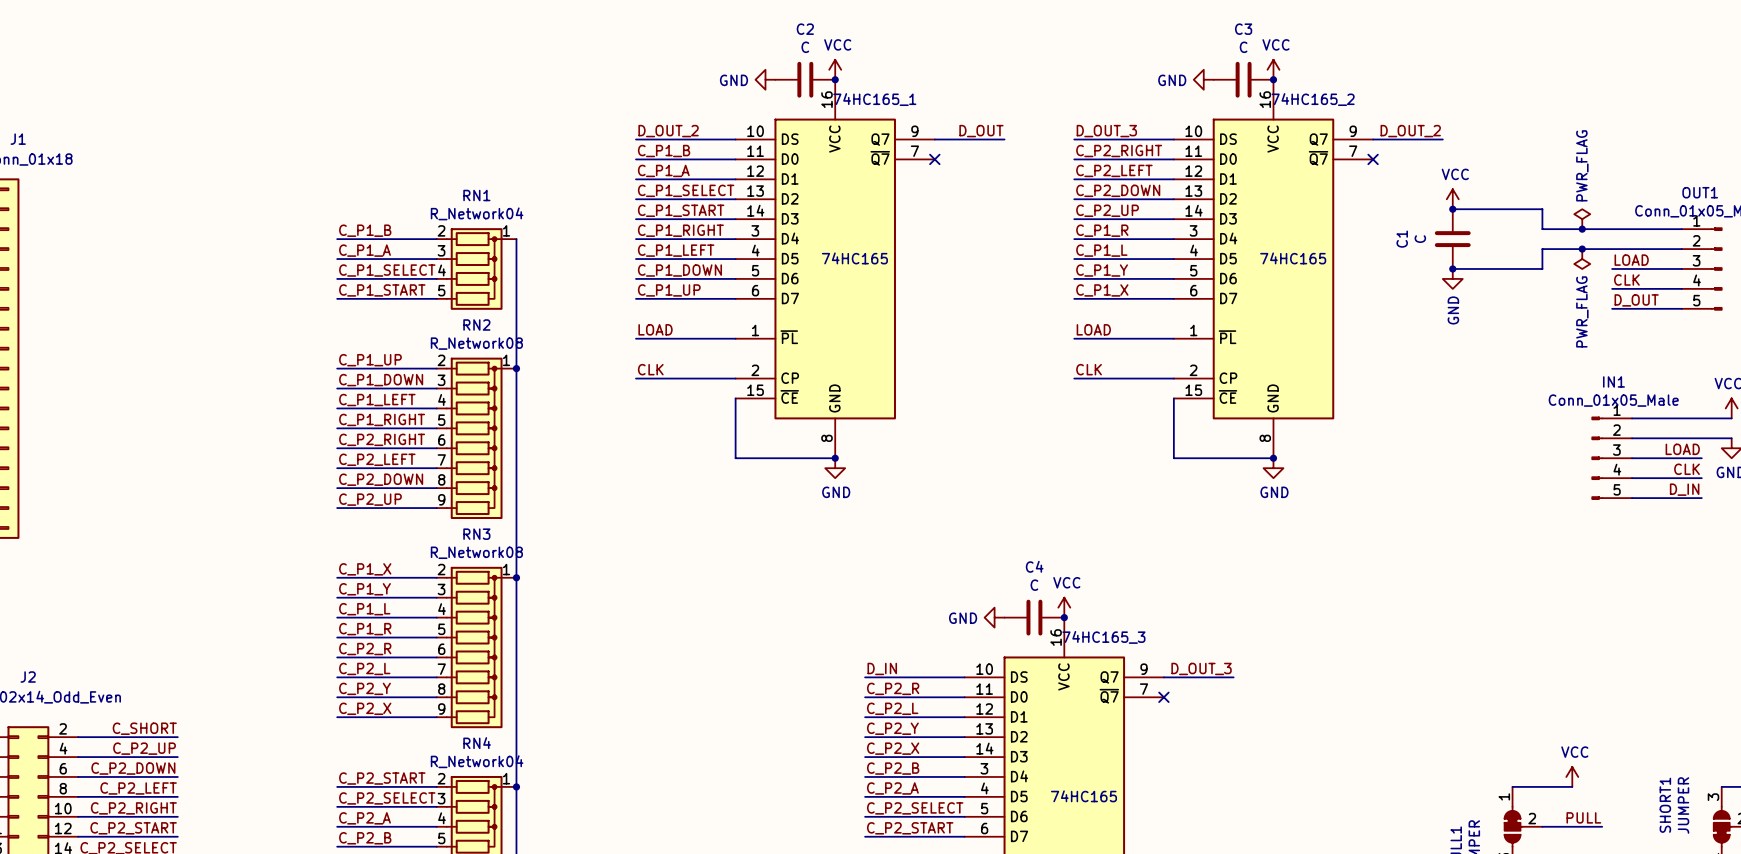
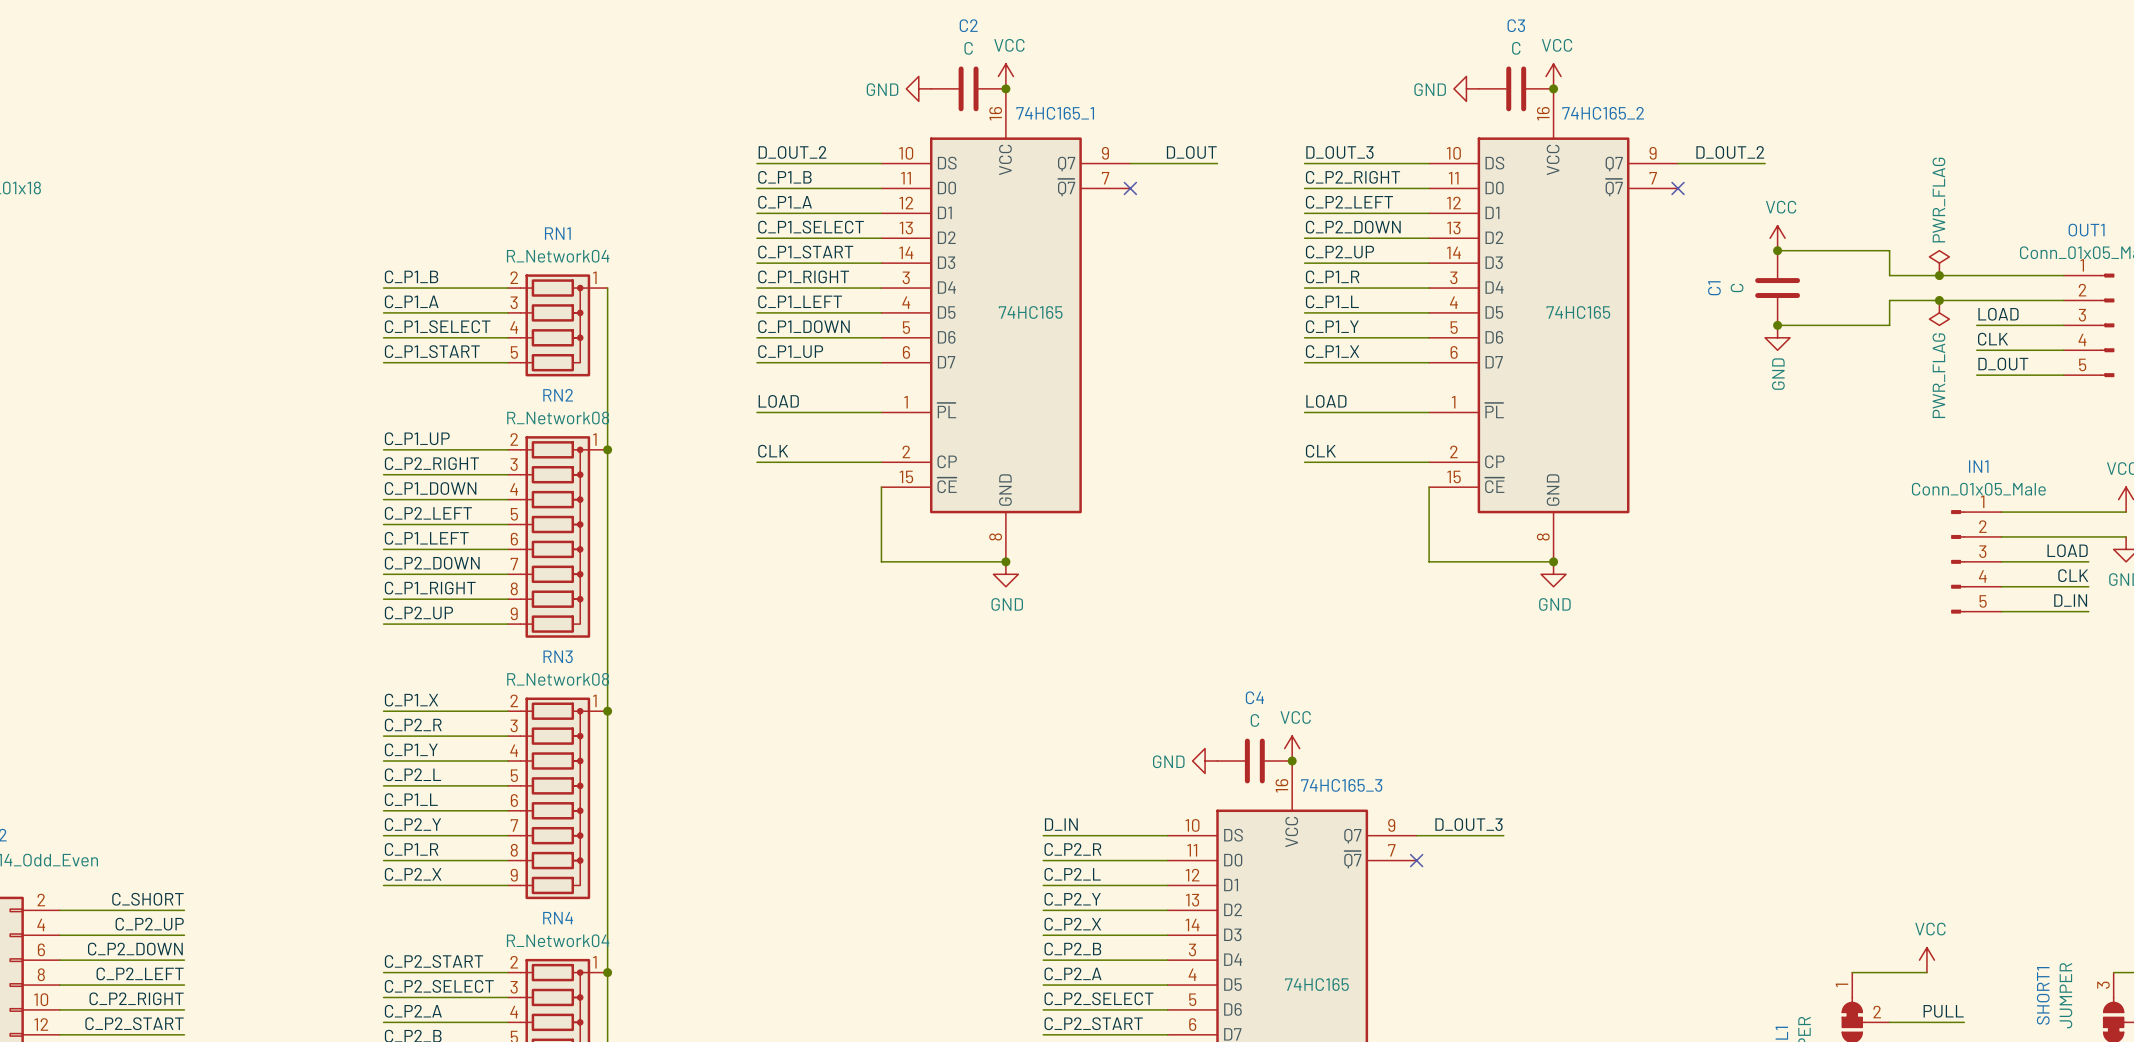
label: C_P1_DOWN (381, 380) -> C_P2_RIGHT (431, 463)
label: C_P1_LEFT (377, 400) -> C_P1_DOWN (430, 488)
label: C_P1_RIGHT (382, 419) -> C_P2_LEFT (428, 513)
label: C_P2_RIGHT (382, 439) -> C_P1_LEFT (426, 538)
label: C_P2_LEFT (377, 459) -> C_P2_DOWN (432, 563)
label: C_P2_DOWN (381, 479) -> C_P1_RIGHT (430, 588)
label: C_P1_Y (365, 589) -> C_P2_R (413, 725)
label: C_P1_L (364, 609) -> C_P1_Y (411, 749)
label: C_P1_R (365, 629) -> C_P2_L (412, 774)
label: C_P2_R (365, 649) -> C_P1_L (411, 799)
label: C_P2_L (364, 668) -> C_P2_Y (412, 824)
label: C_P2_Y (365, 688) -> C_P1_R (411, 849)

